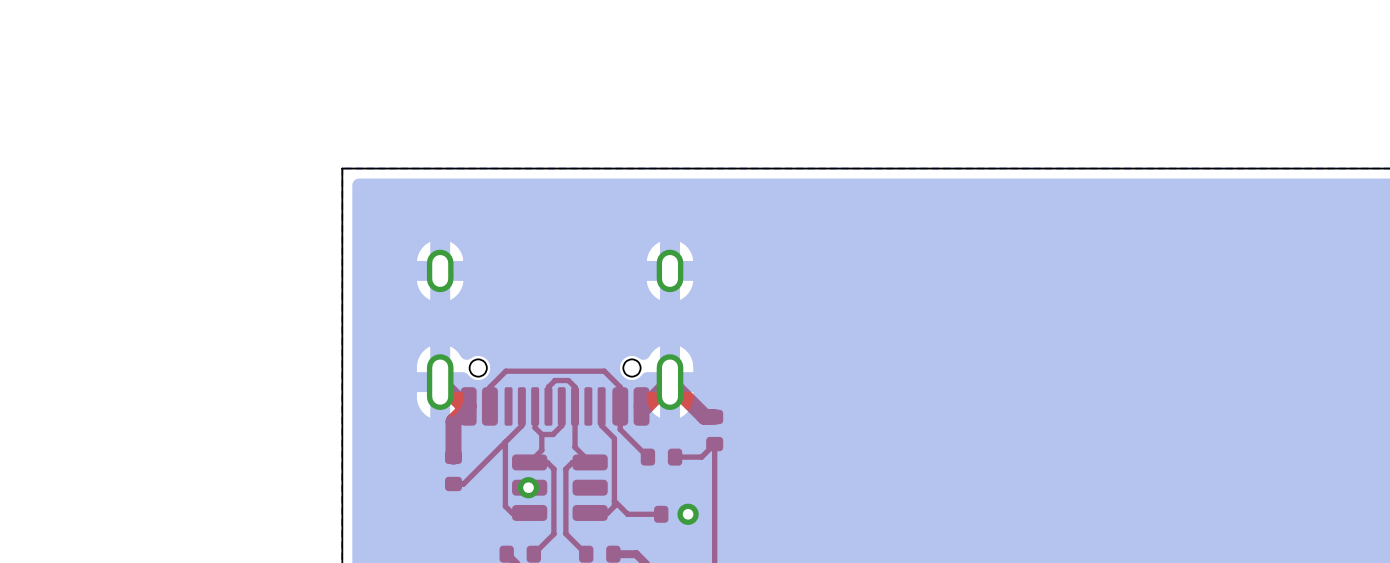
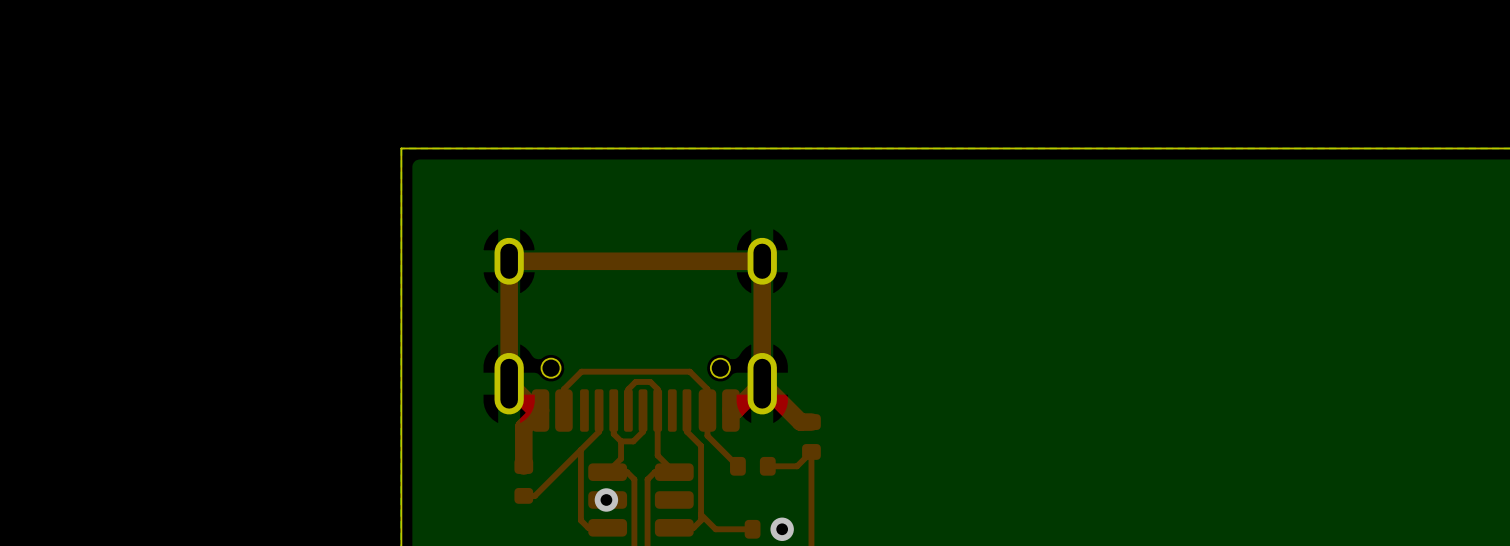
top track: none -> (762, 383) (762, 261) (509, 261) (509, 383)

